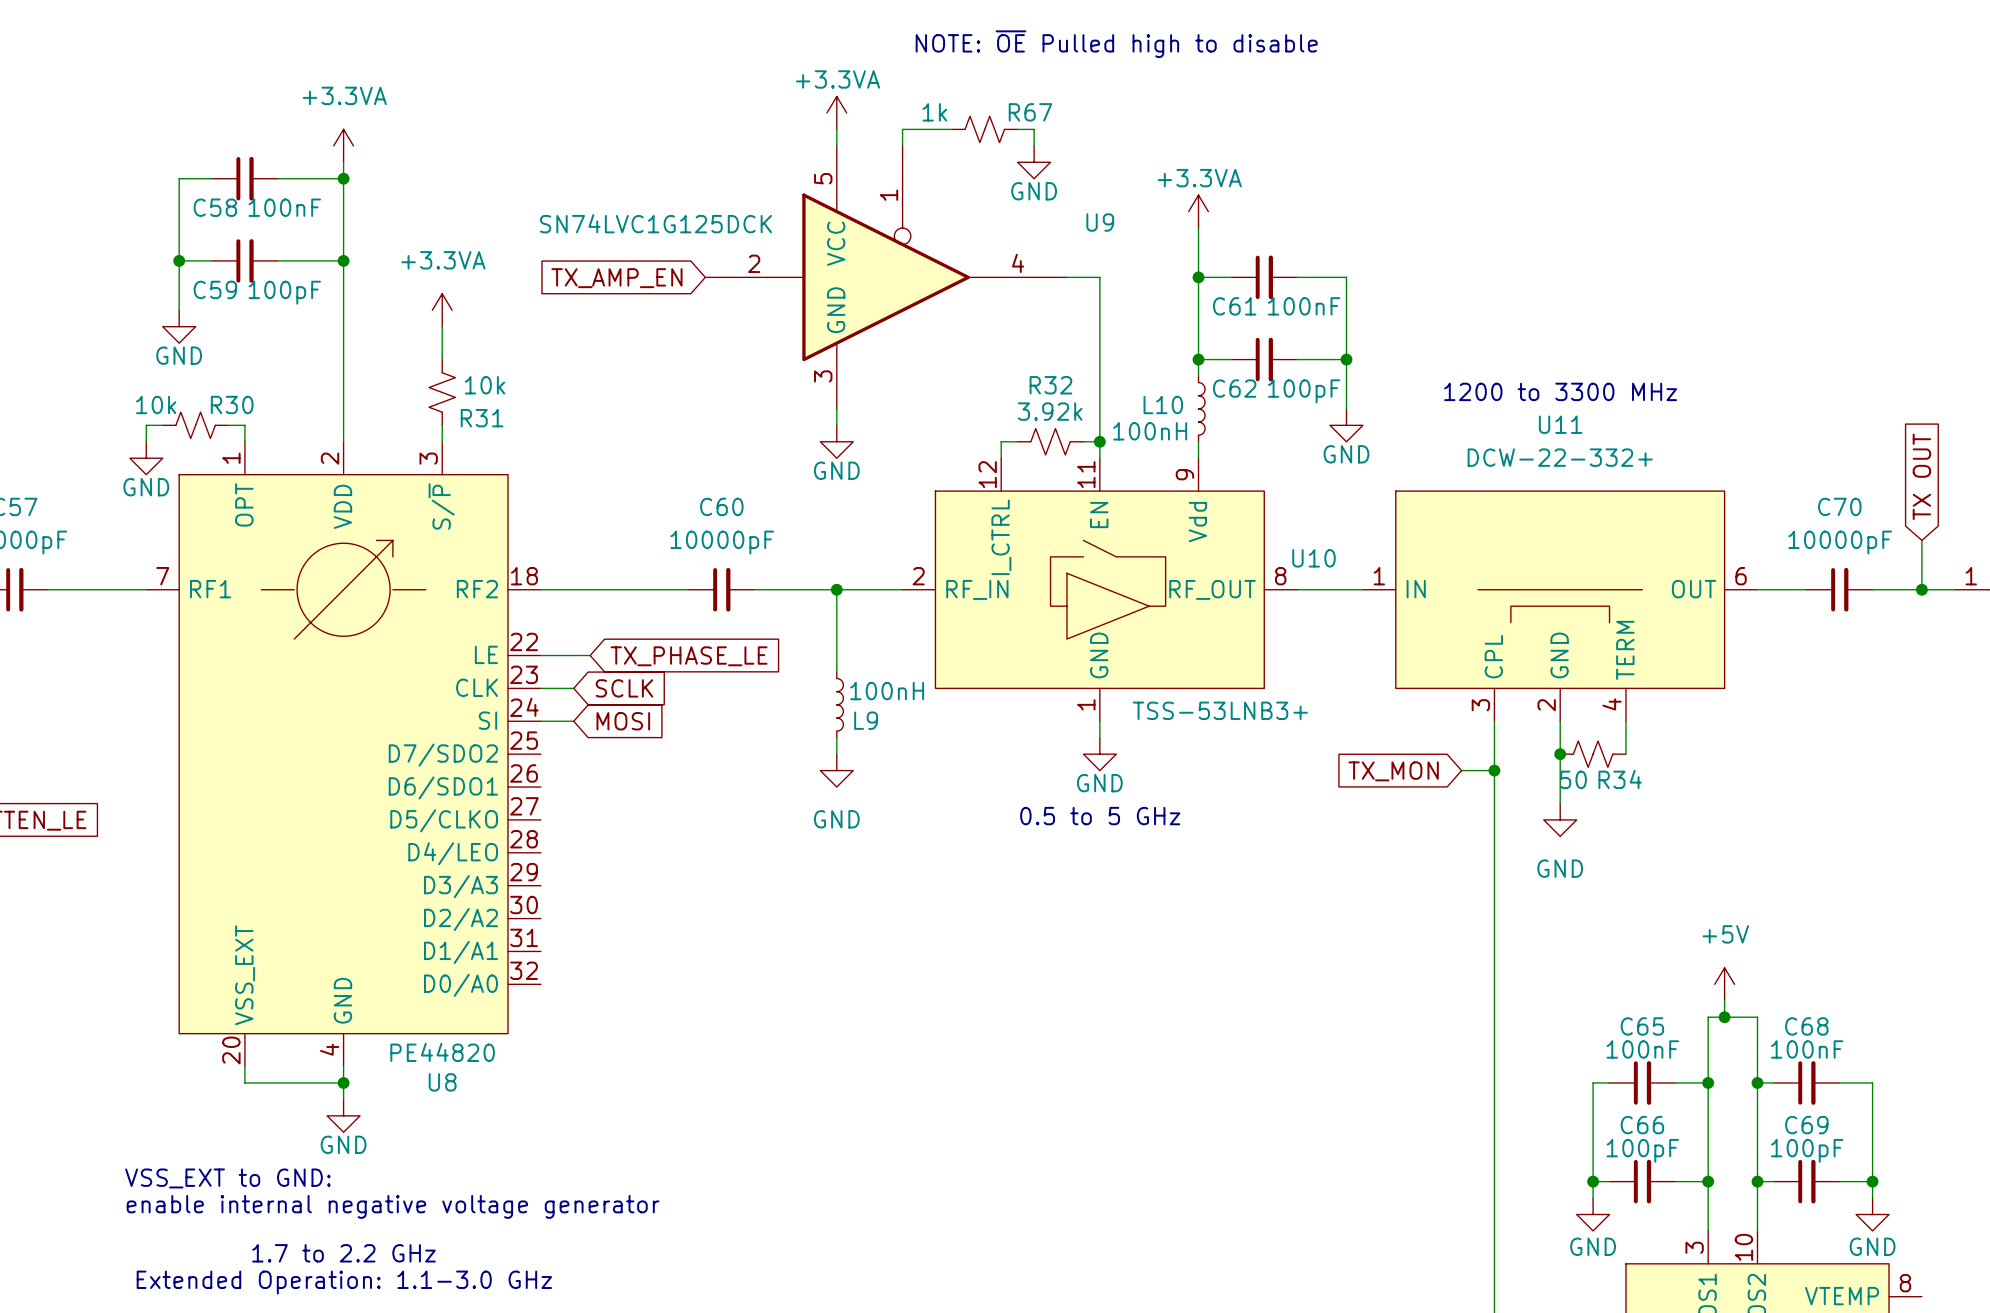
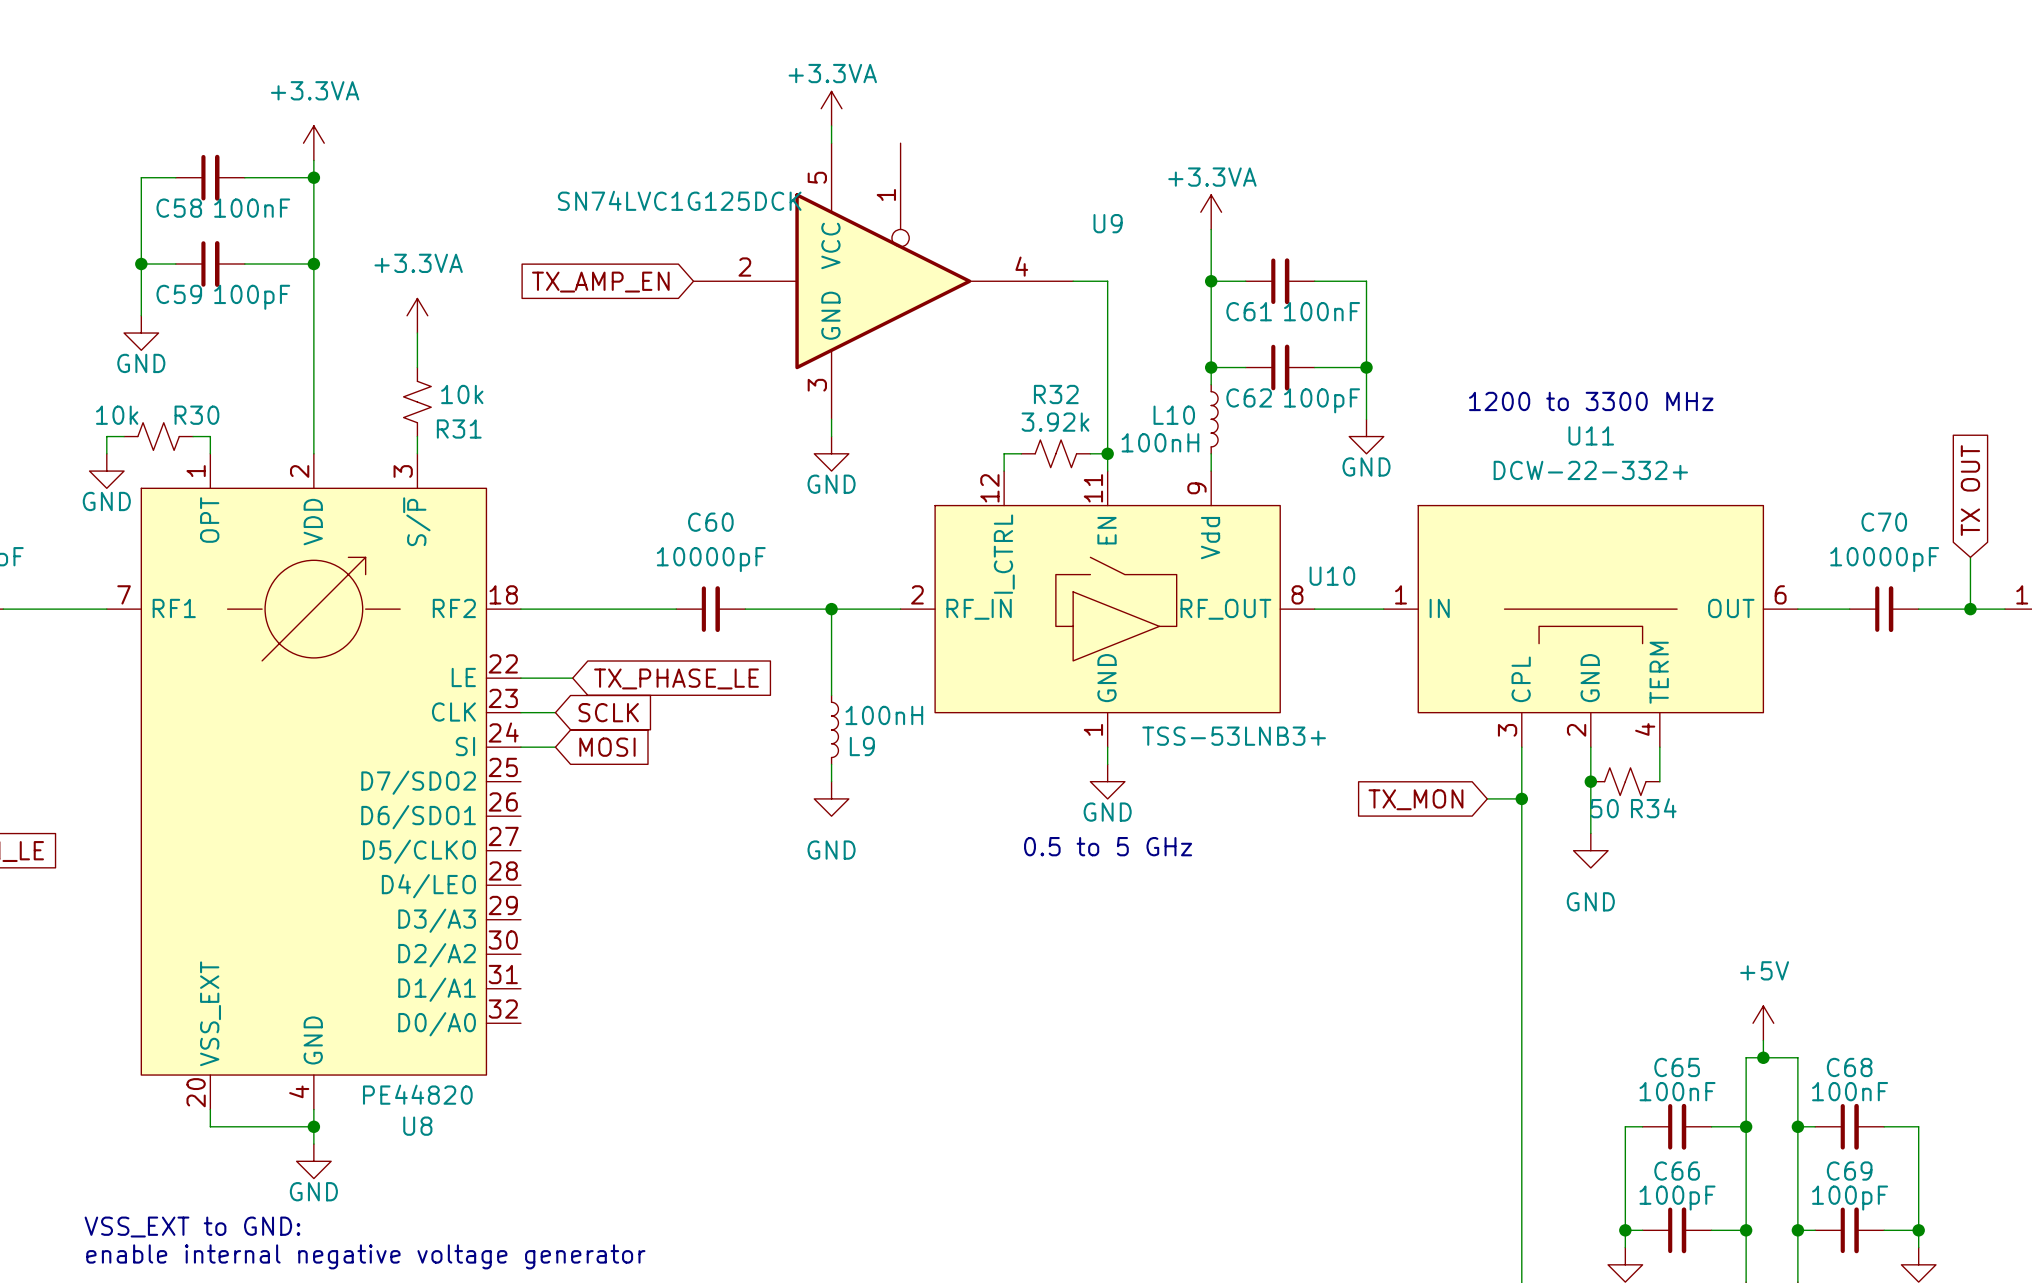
text: NOTE: ~{OE} Pulled high to disable (1116, 44) -> none
wire: (951, 129) (902, 129) (902, 145) -> none
R67: 1k (984, 129) -> none
wire: (1017, 129) (1034, 129) (1034, 145) -> none
power symbol: GND (1034, 162) -> none
U9 value position: SN74LVC1G125DCK (655, 223) -> SN74LVC1G125DCK (679, 200)

